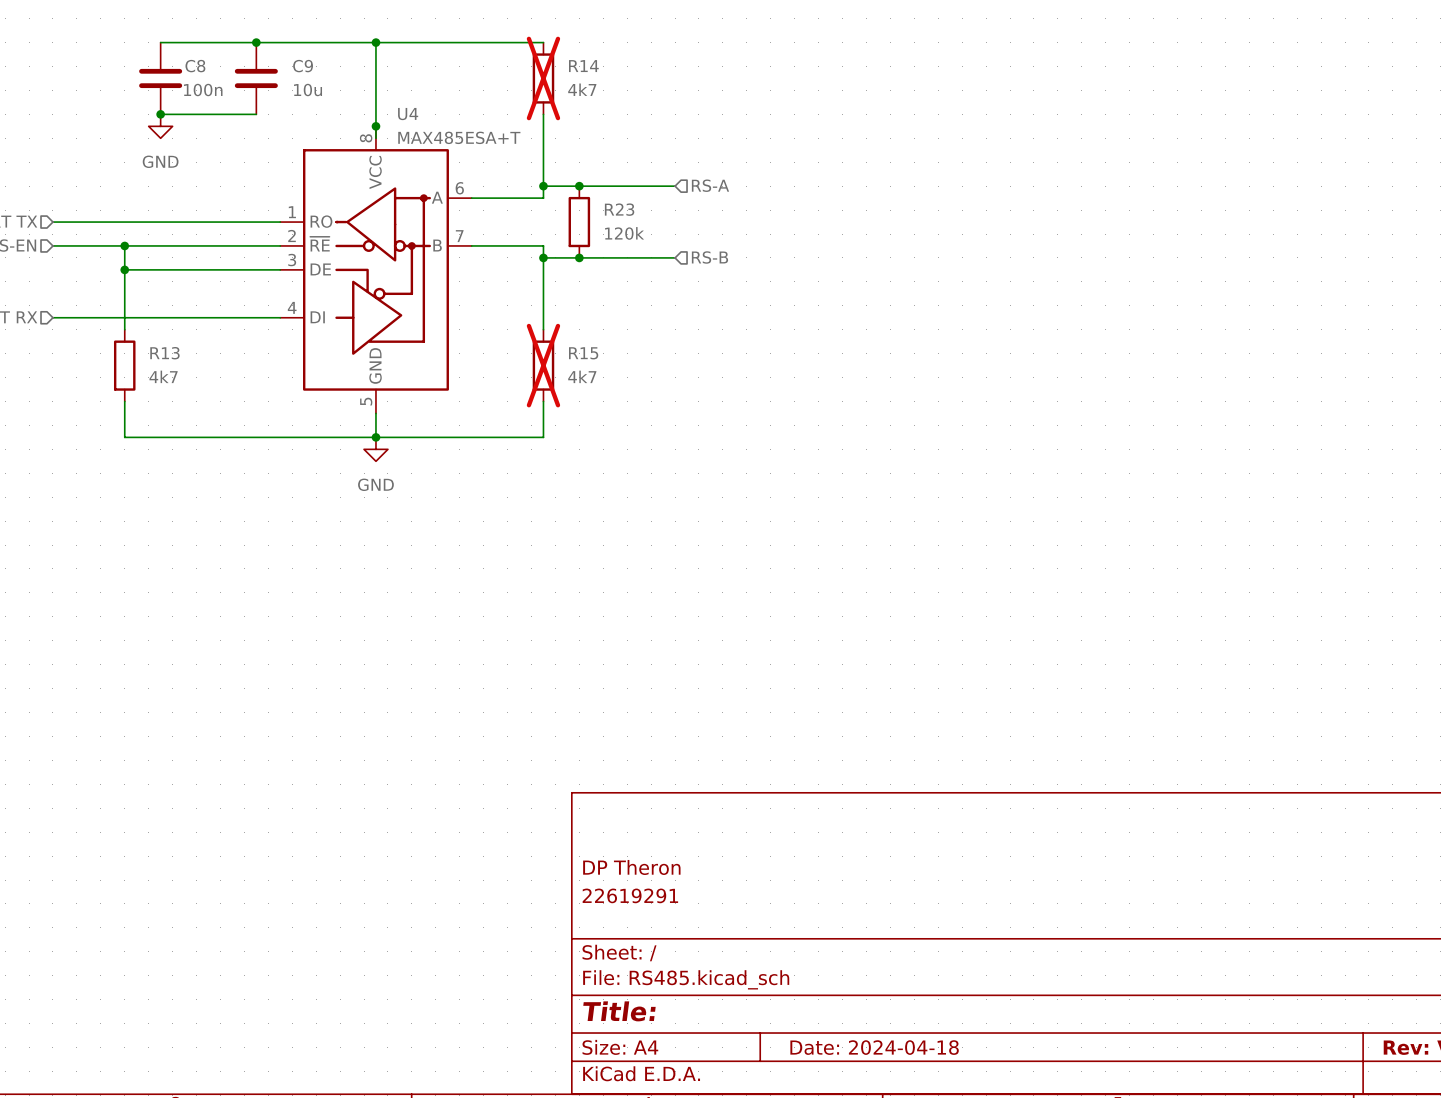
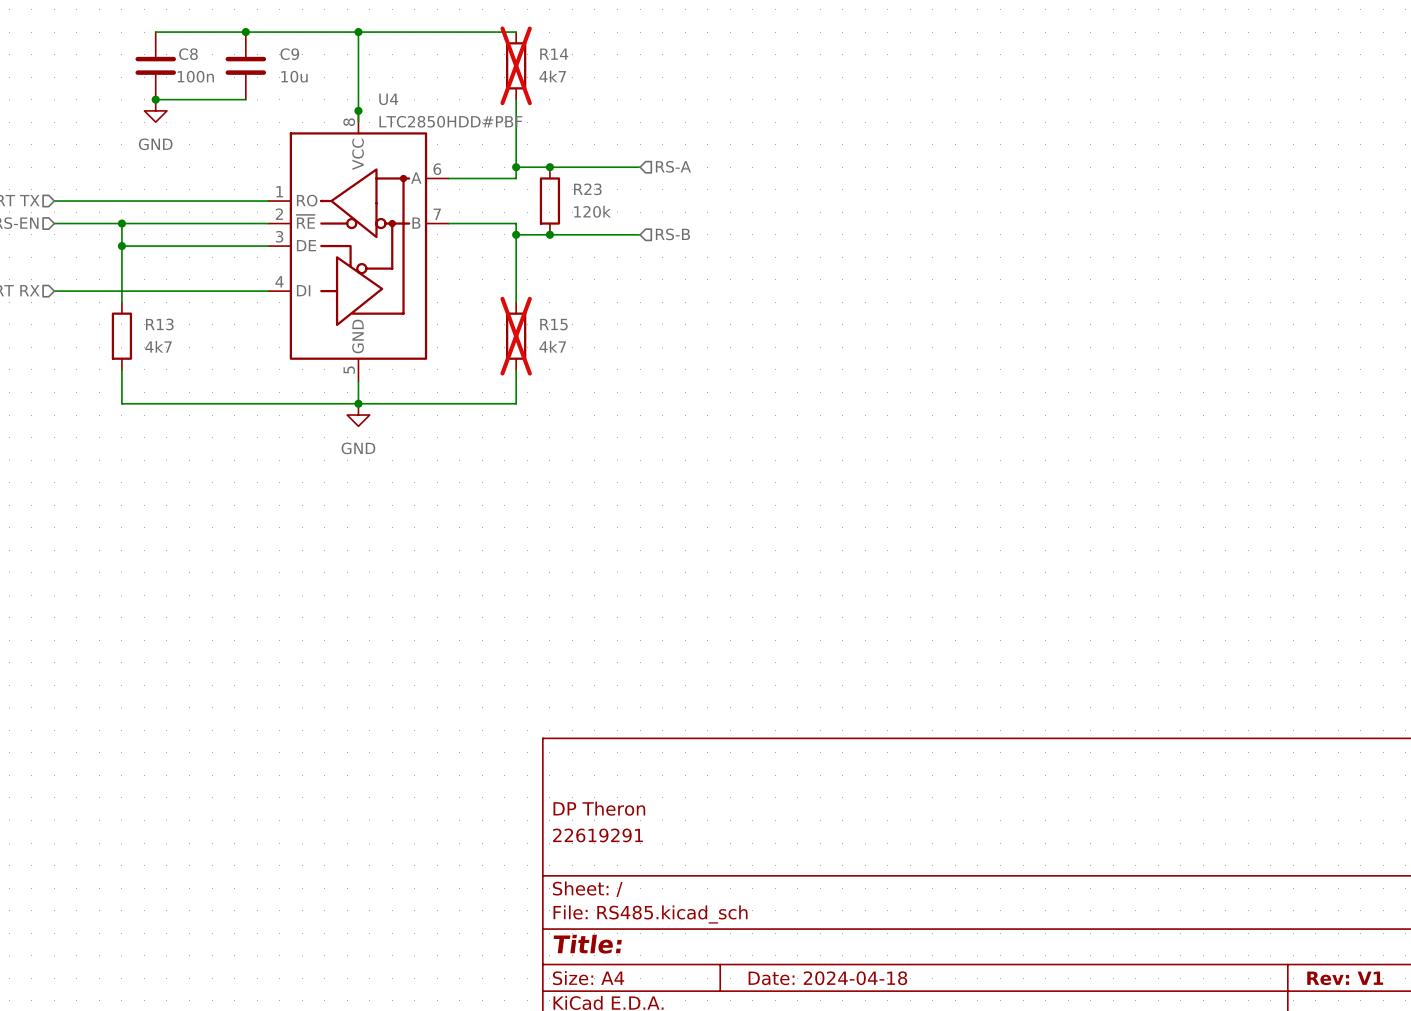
U4 value: MAX485ESA+T (459, 137) -> LTC2850HDD#PBF (450, 121)

